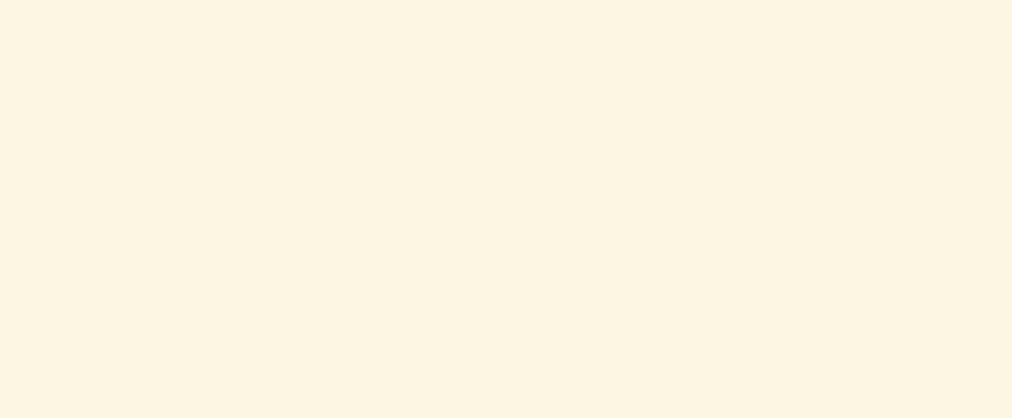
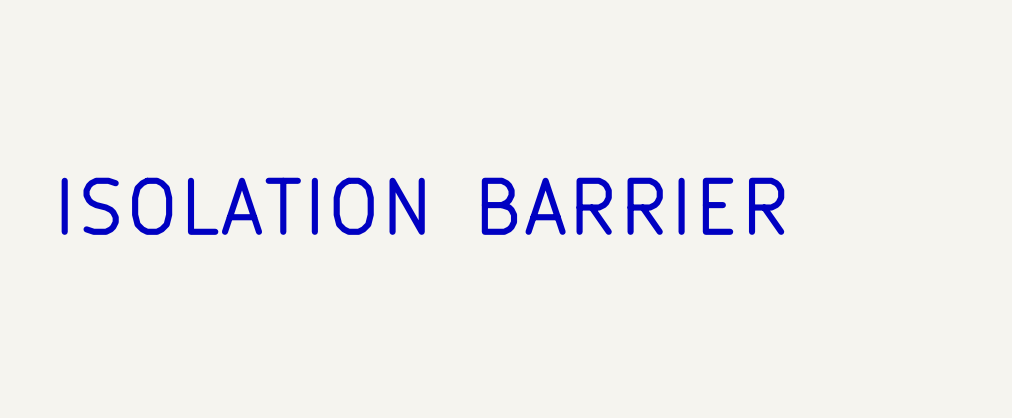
text: none -> ISOLATION BARRIER (422, 206)

